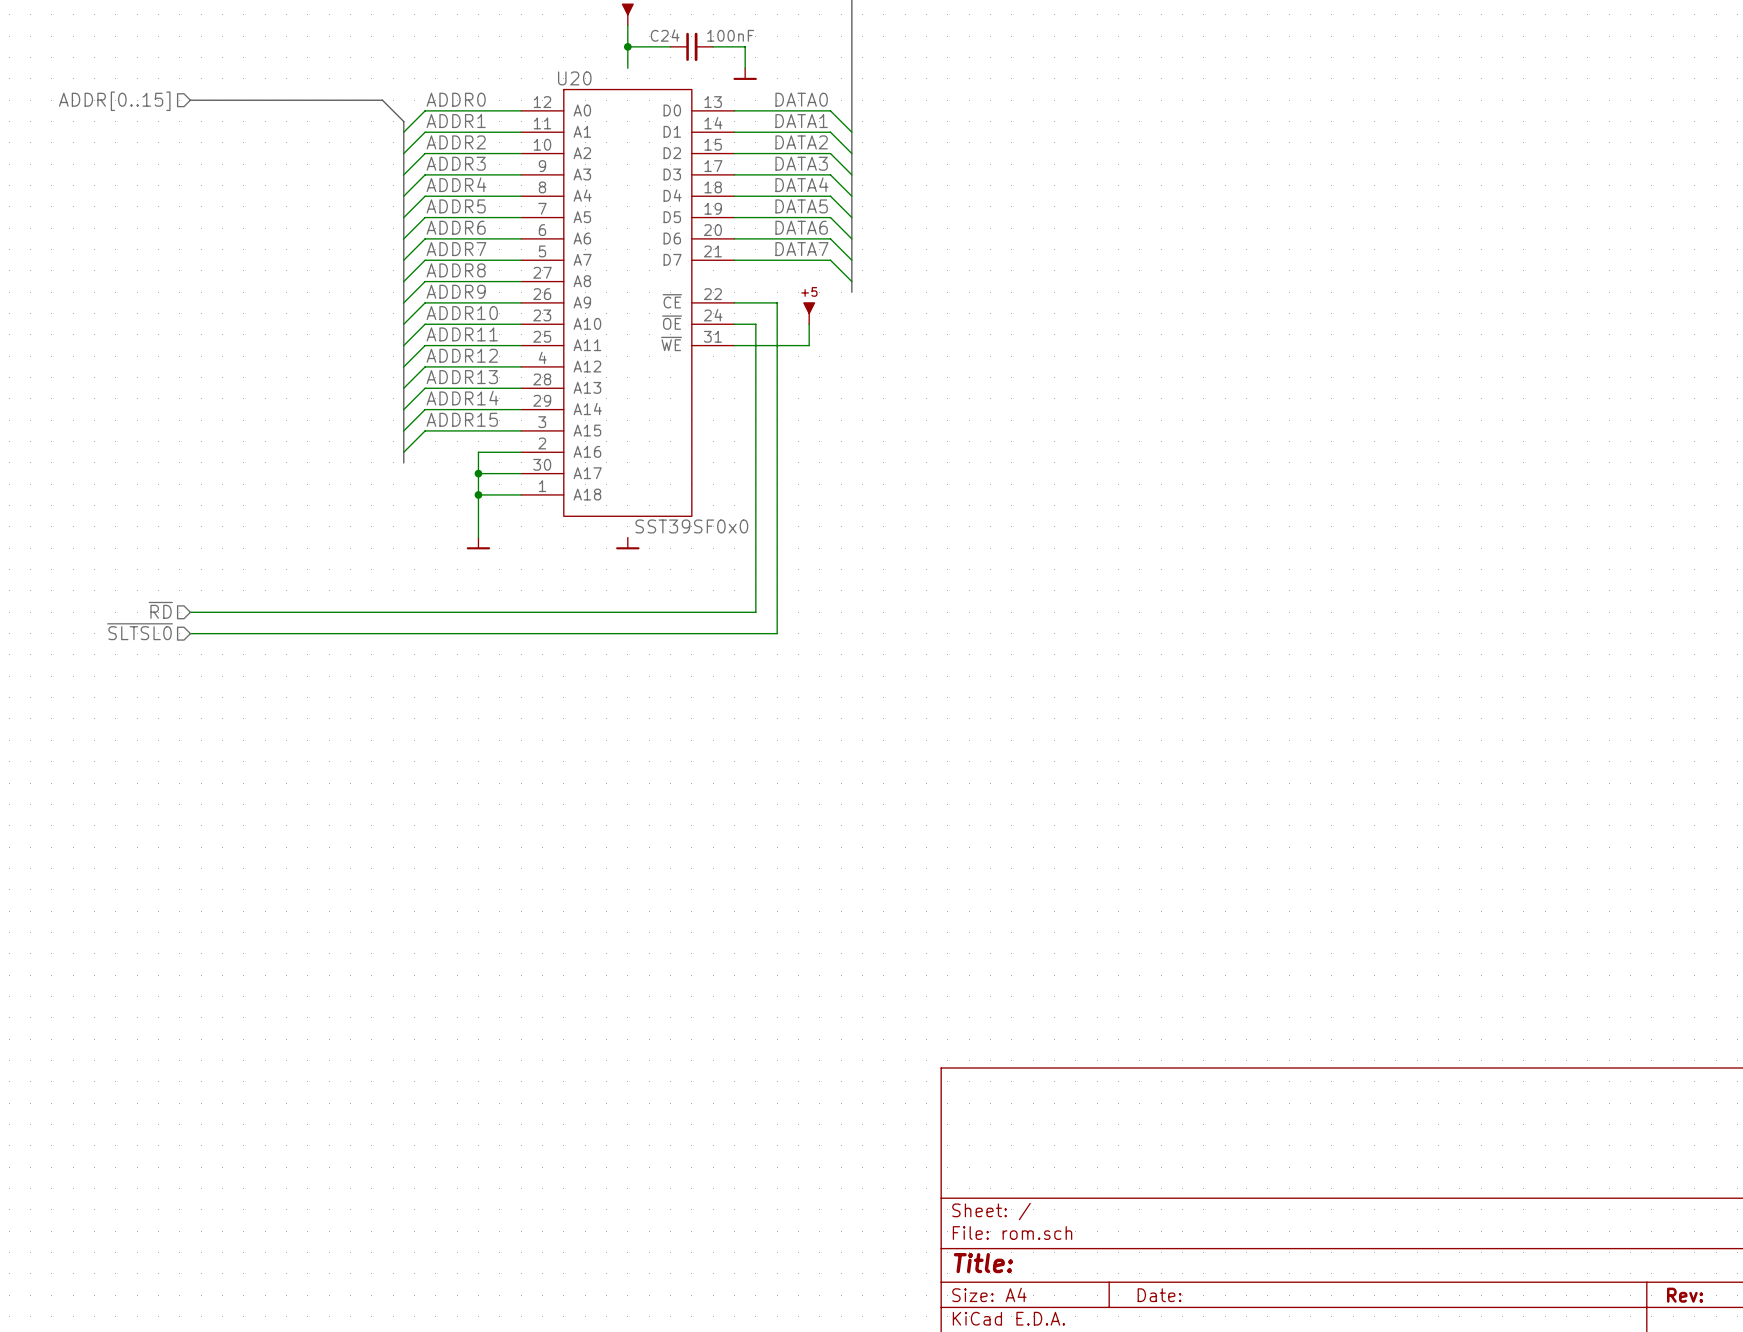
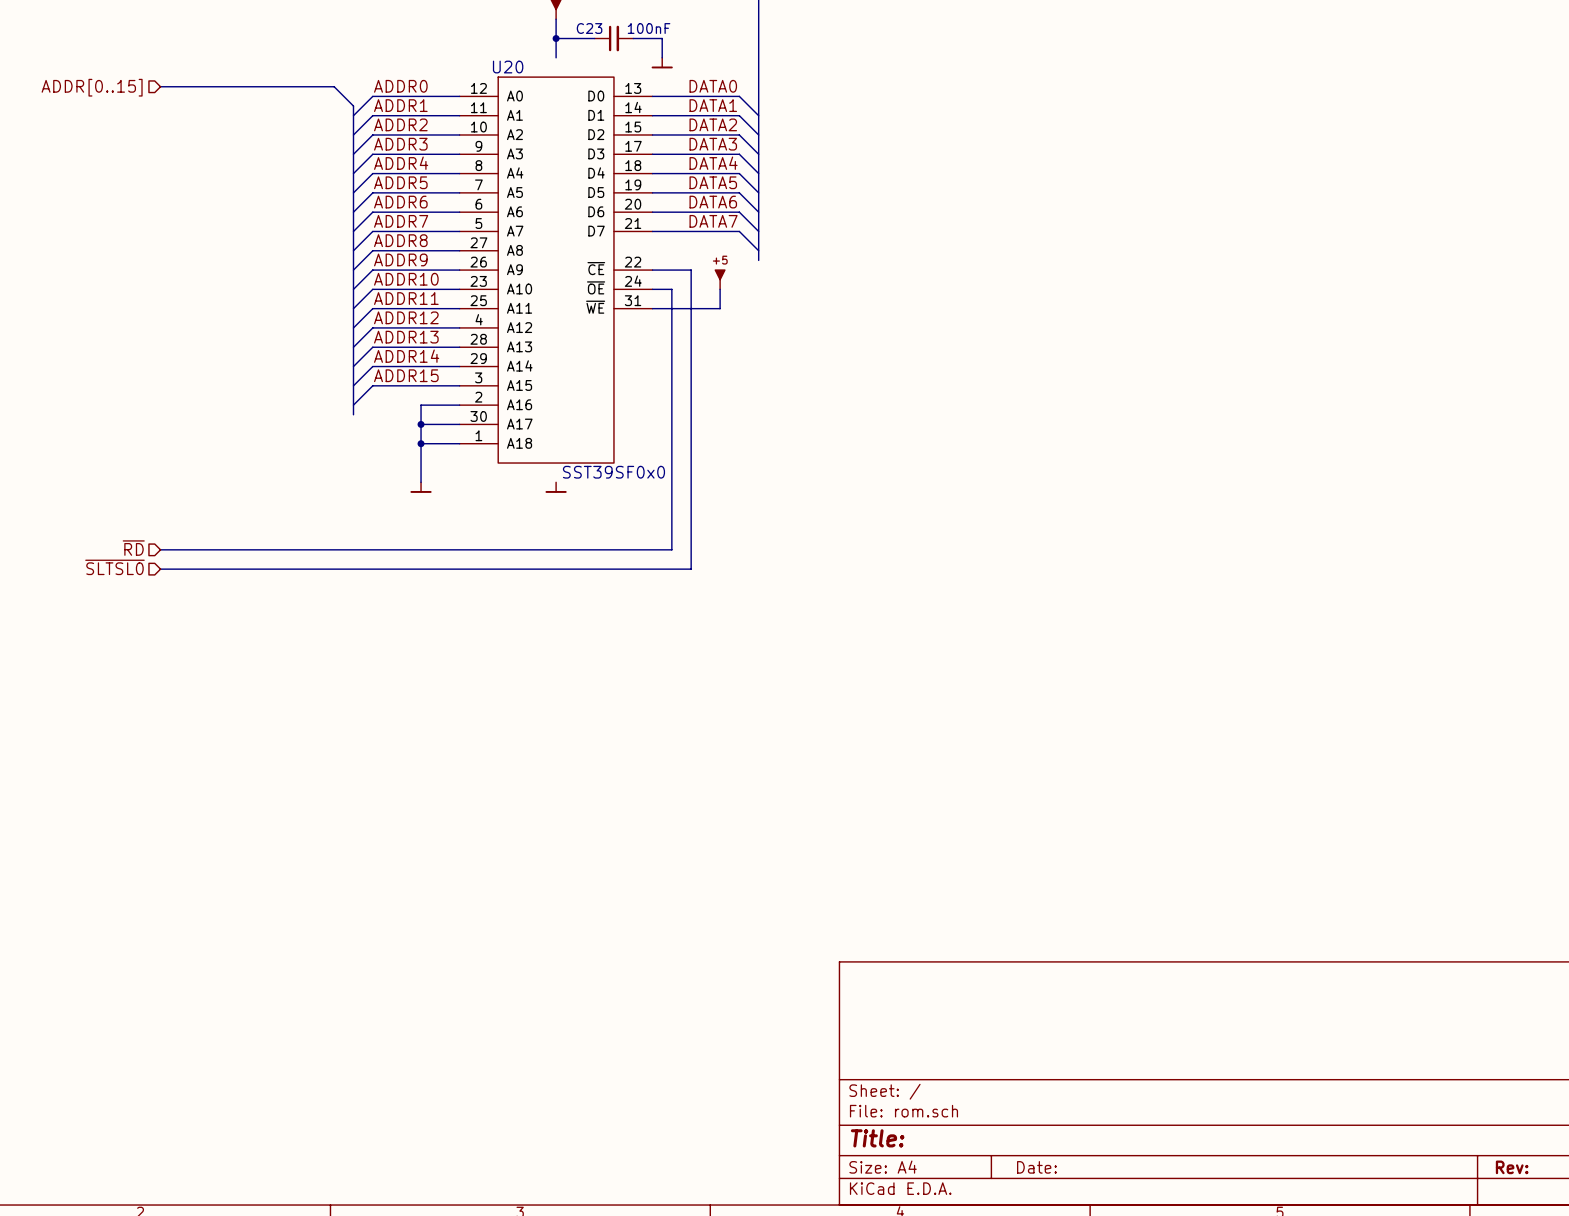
C24 name: C24 (665, 35) -> C23 (589, 28)

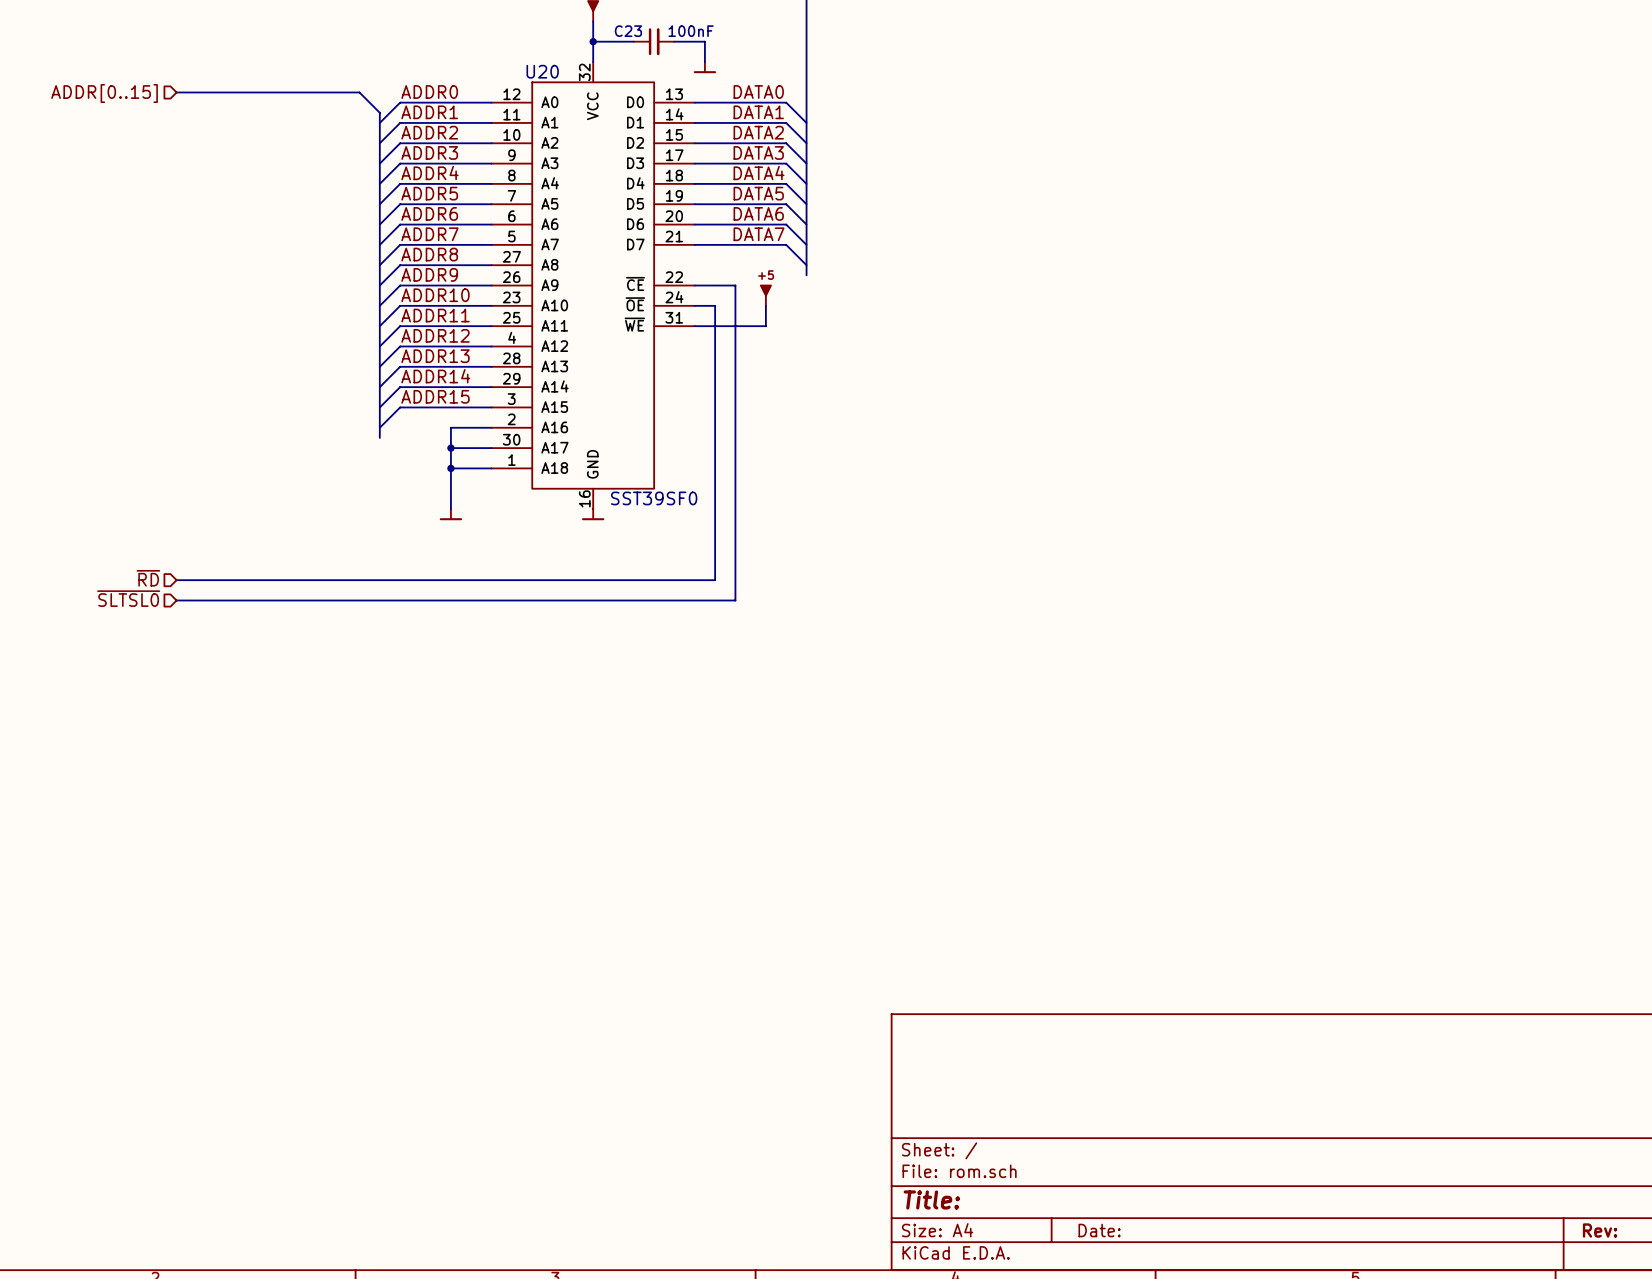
U20 symbol: [459, 77, 653, 464] -> [491, 62, 695, 510]
U20 value: SST39SF0x0 (613, 472) -> SST39SF0 (654, 498)

